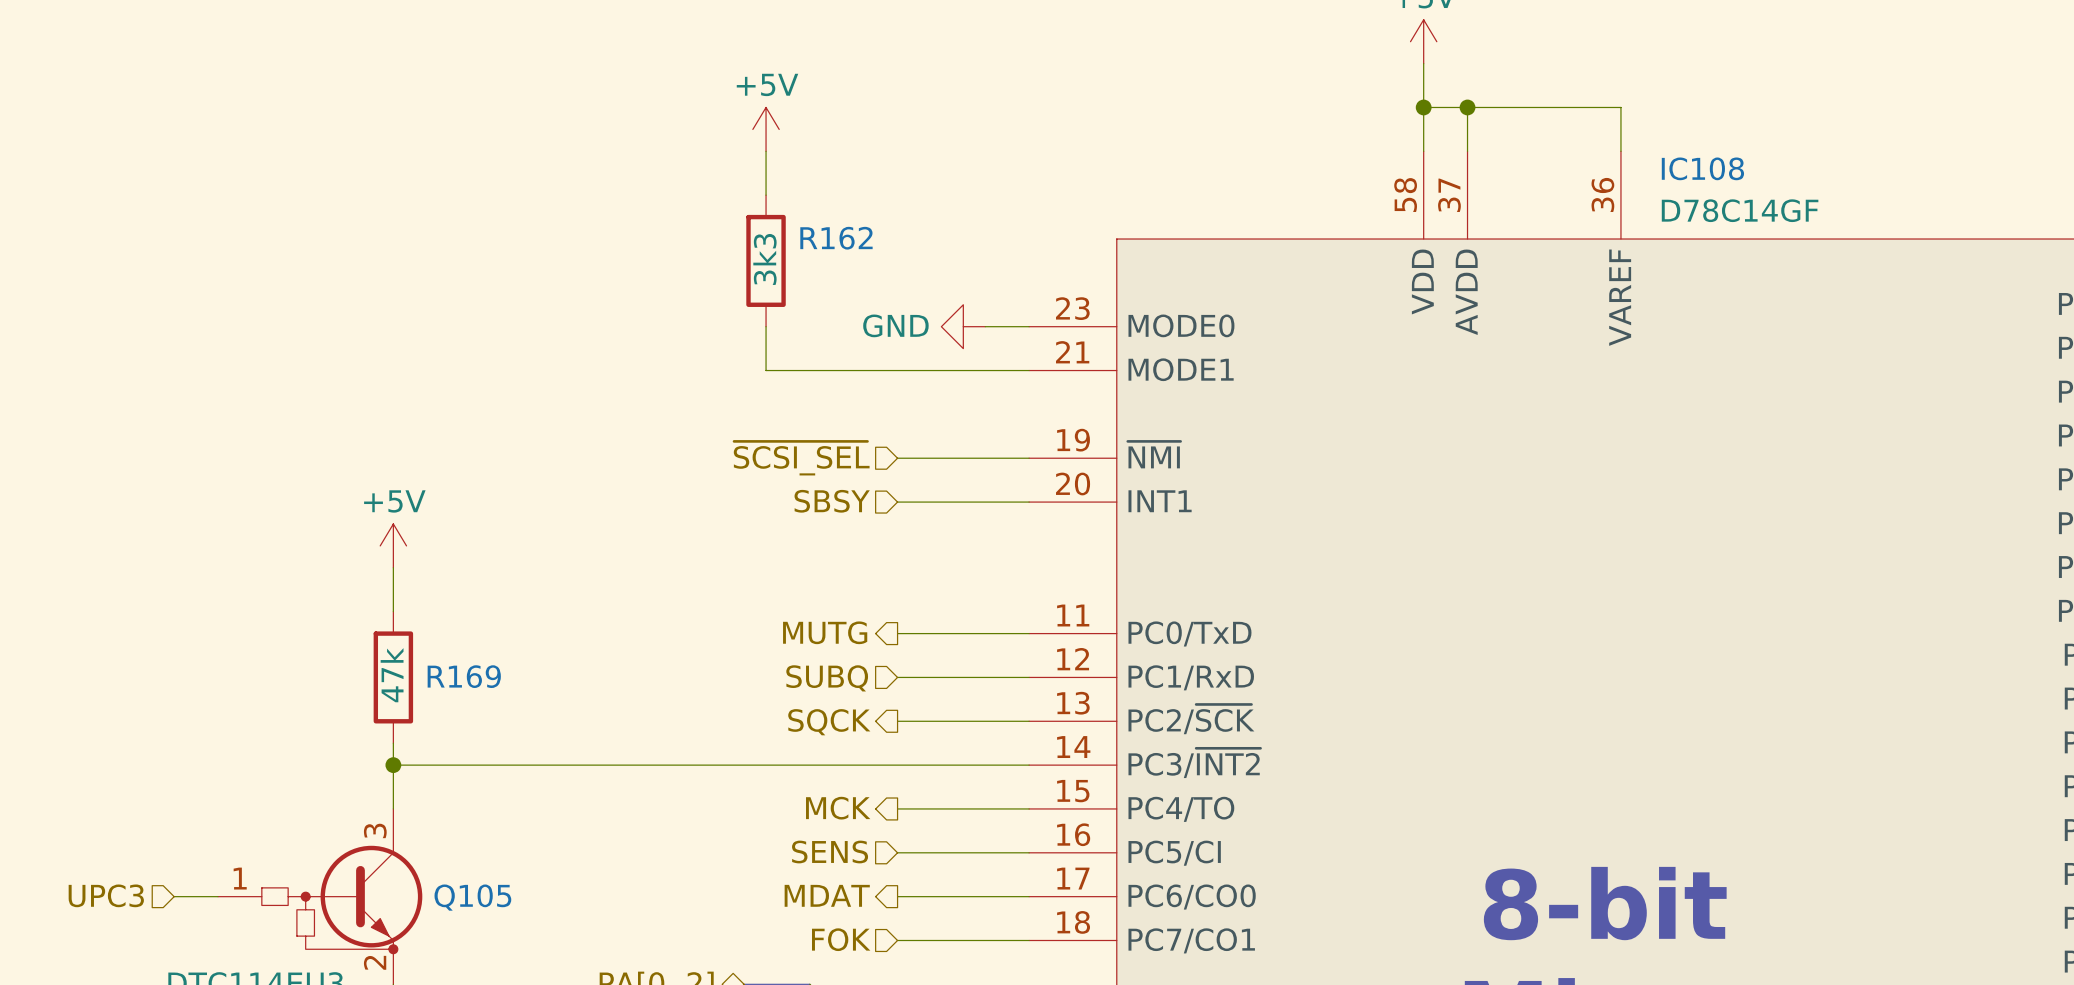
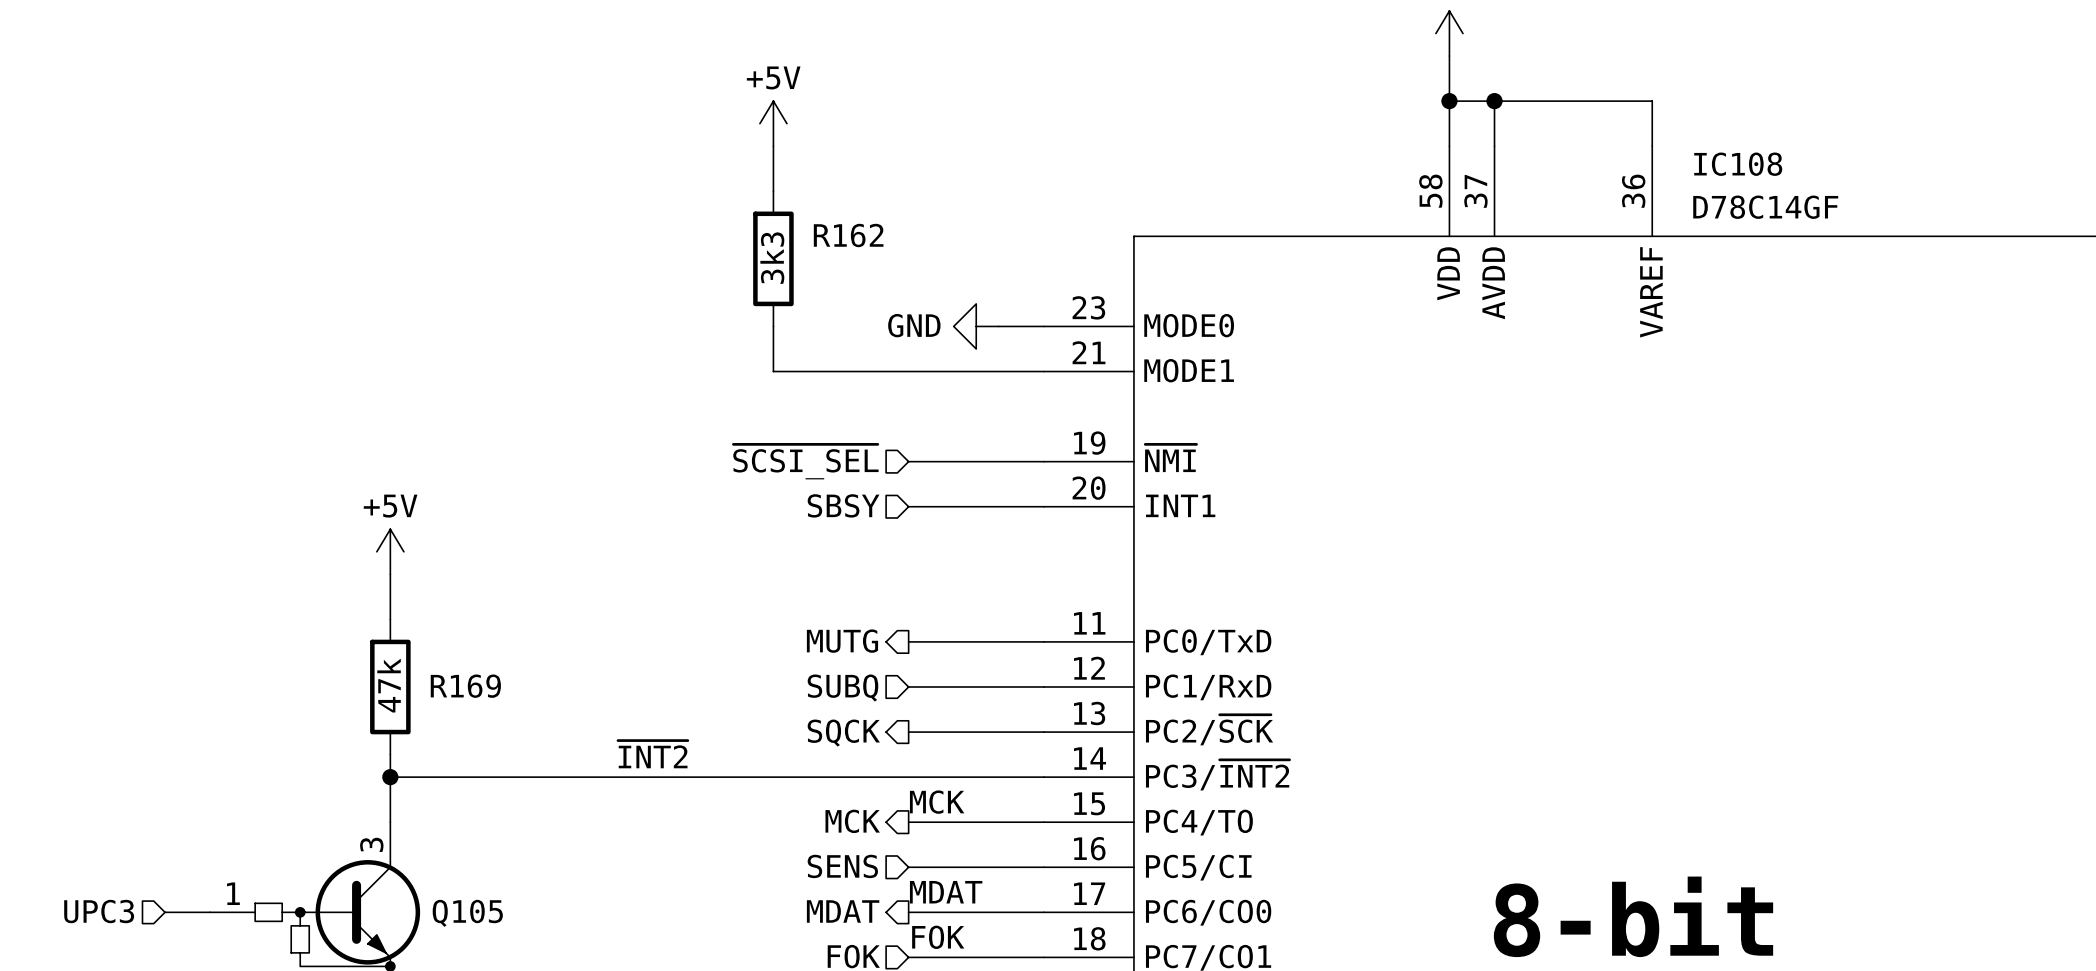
label: none -> ~{INT2} (652, 754)
label: none -> MCK (937, 802)
label: none -> MDAT (946, 892)
label: none -> FOK (938, 937)

